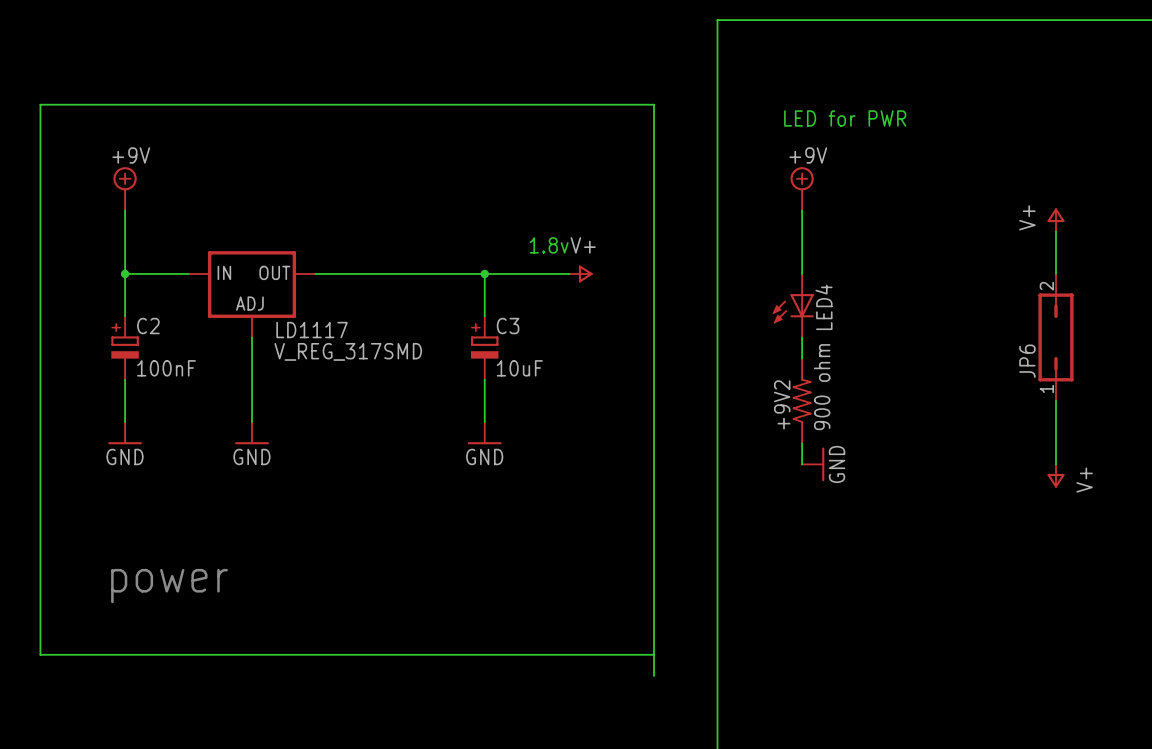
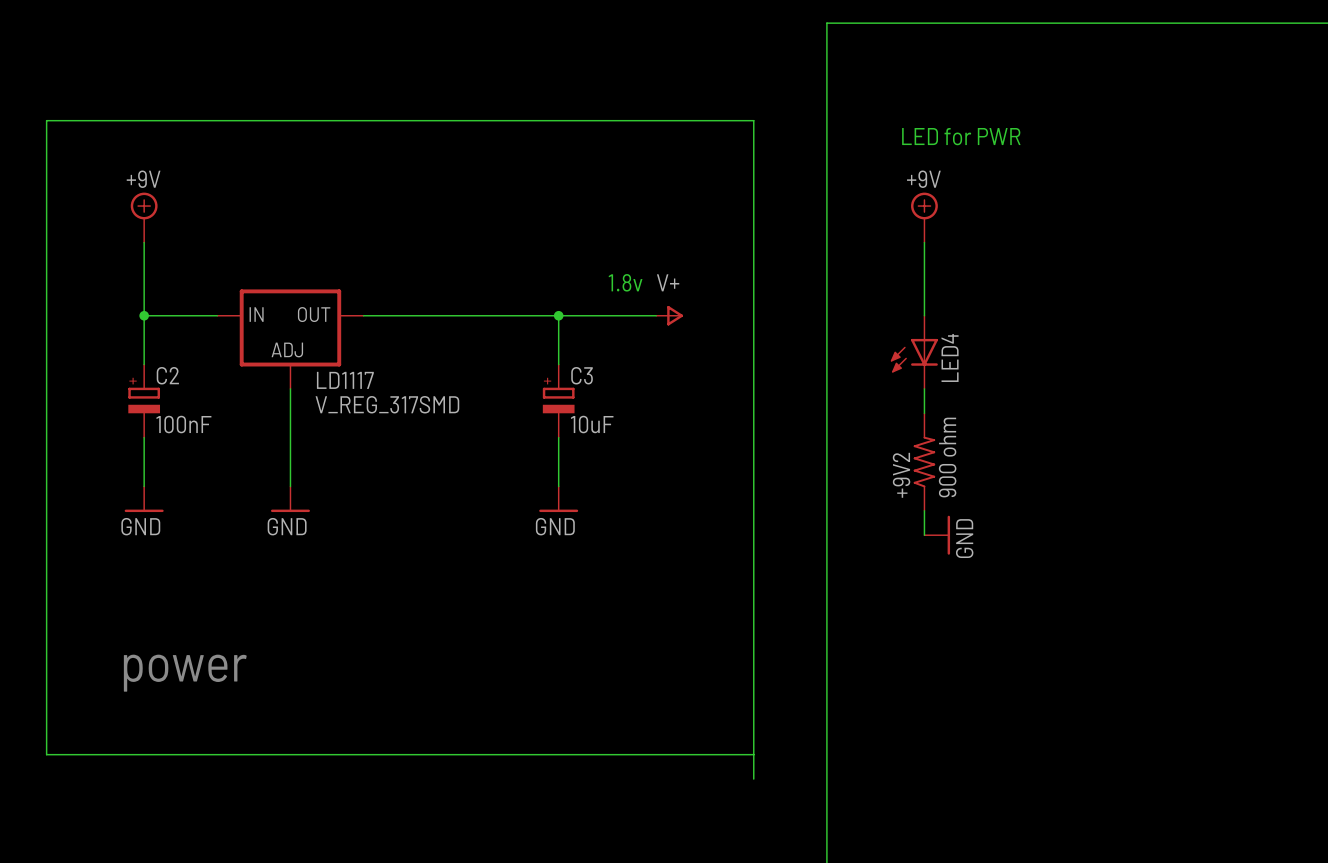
power symbol: V+ (1056, 220) -> none
wire: (1056, 231) (1056, 273) -> none
JP6: (1056, 337) -> none
wire: (1056, 400) (1056, 464) -> none
power symbol: V+ (1056, 476) -> none

